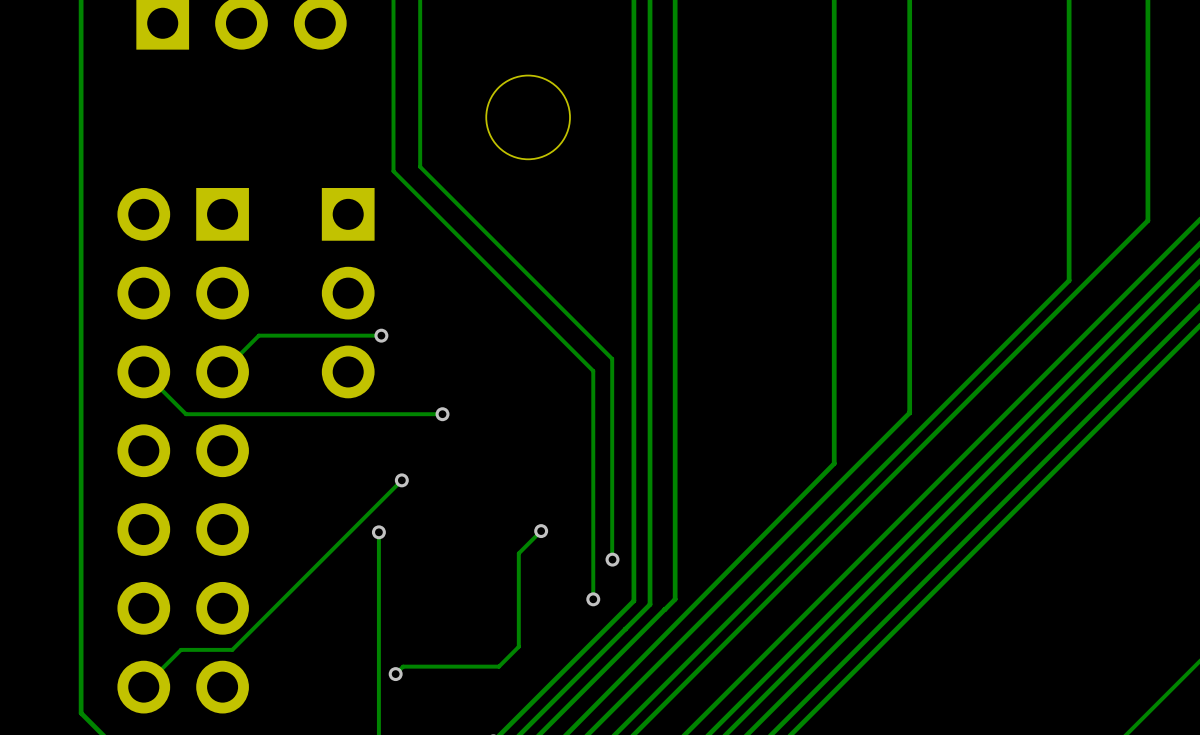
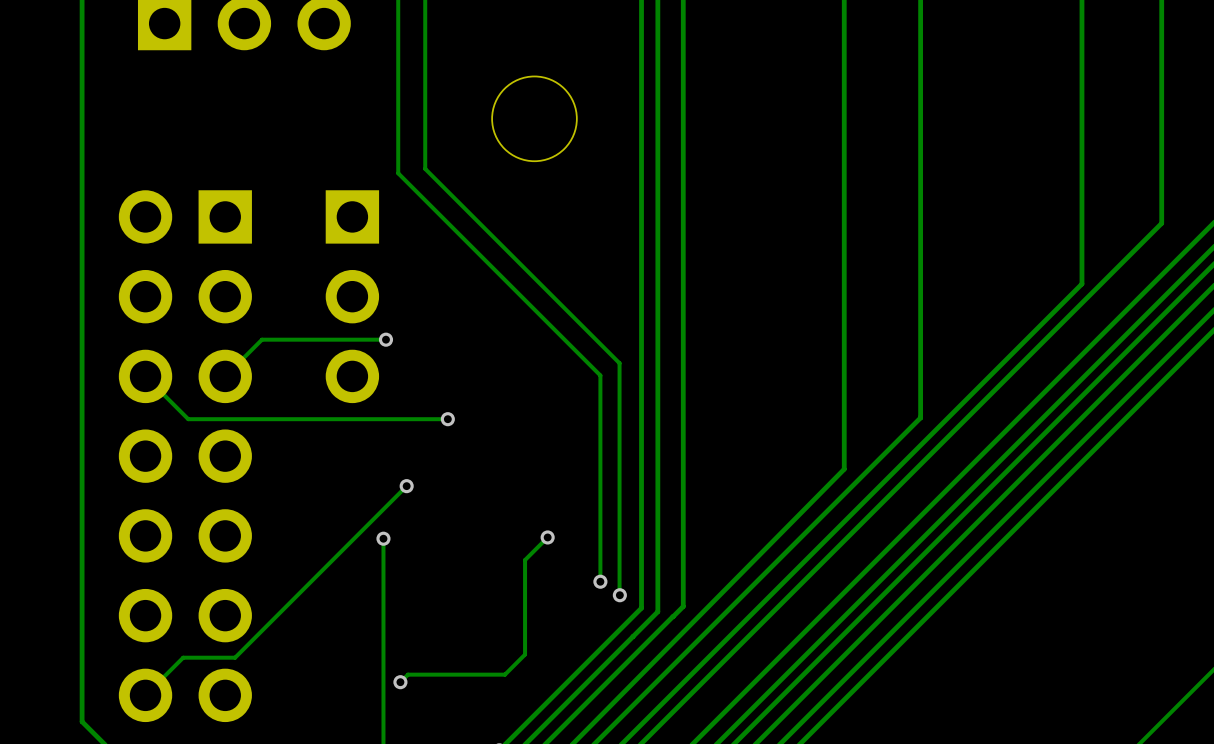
track: none -> (619, 566) (619, 594)
via: (612, 559) -> none
track: (593, 574) (593, 599) -> none
via: none -> (600, 581)
via: none -> (619, 595)
via: (593, 599) -> none

